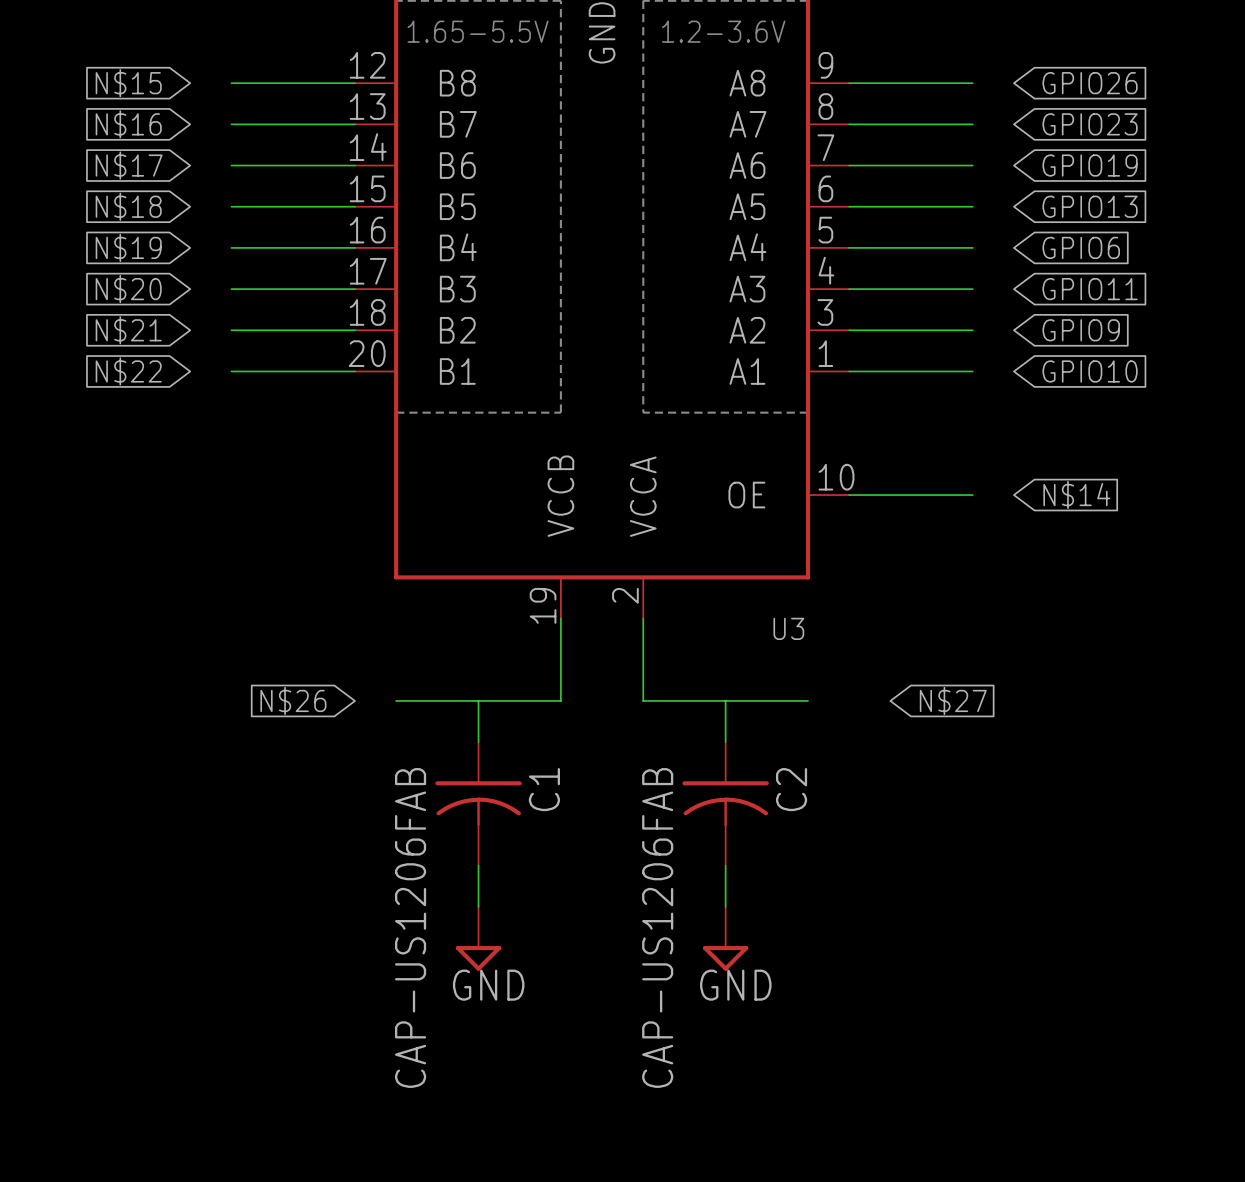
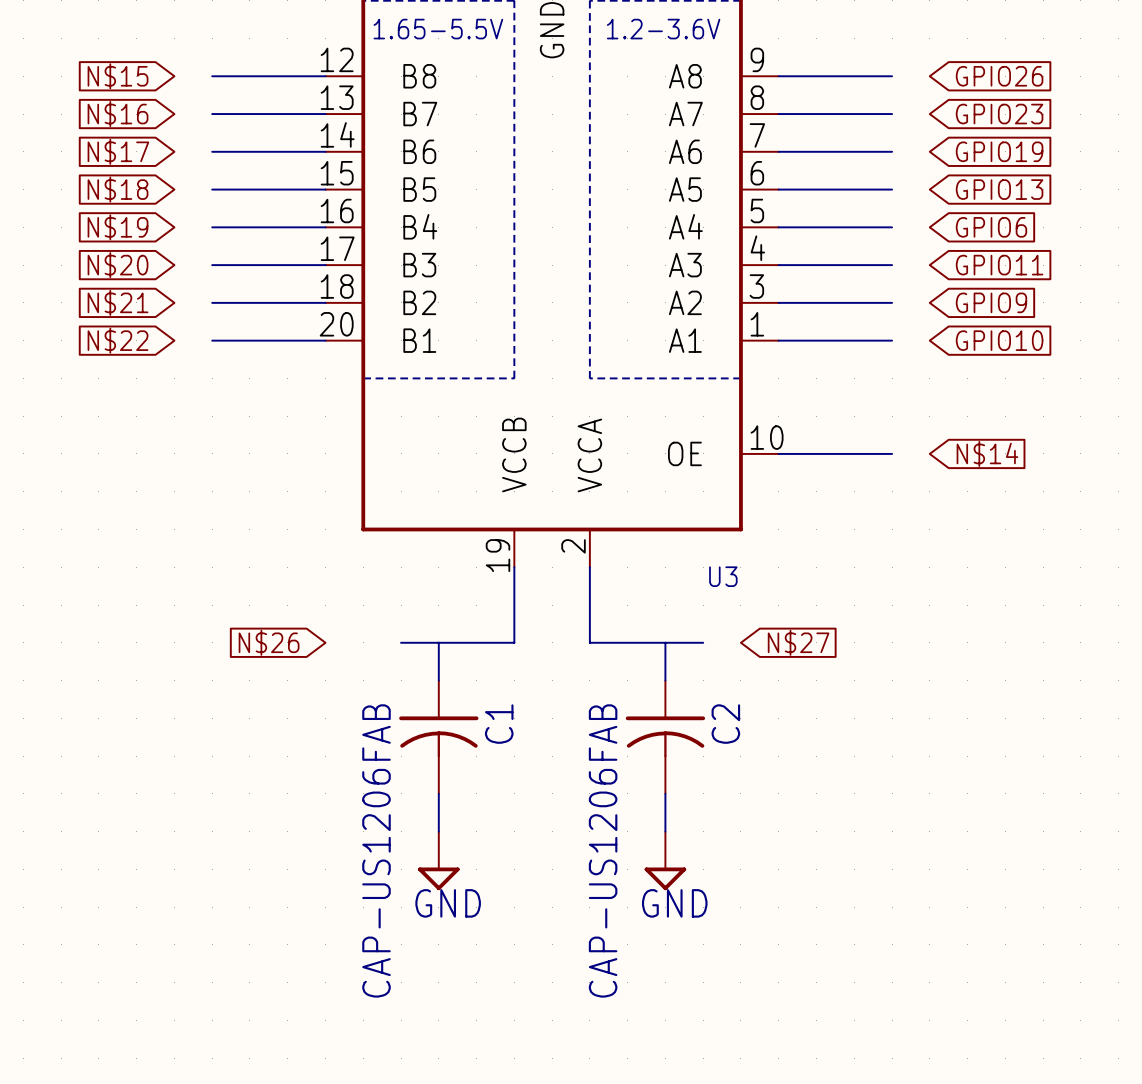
wire: (396, 700) (437, 700) -> none
wire: (766, 700) (808, 700) -> none
global label position: N$27 (953, 700) -> N$27 (798, 642)

